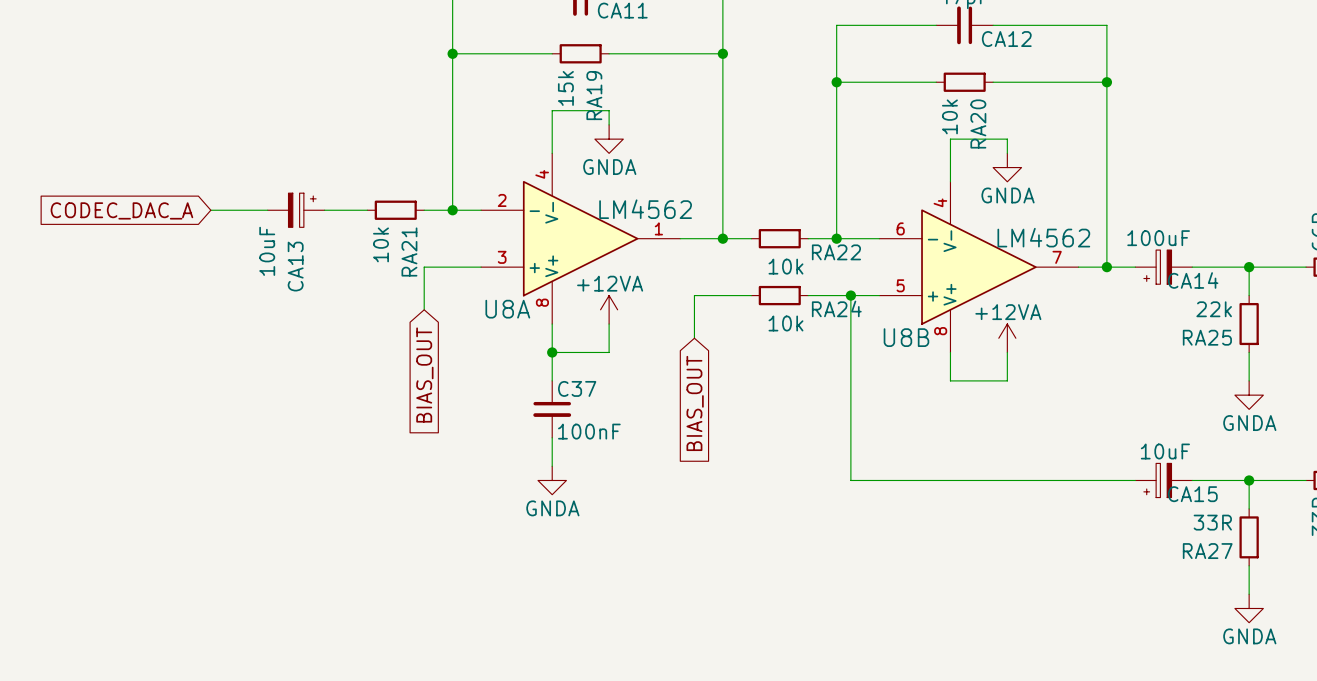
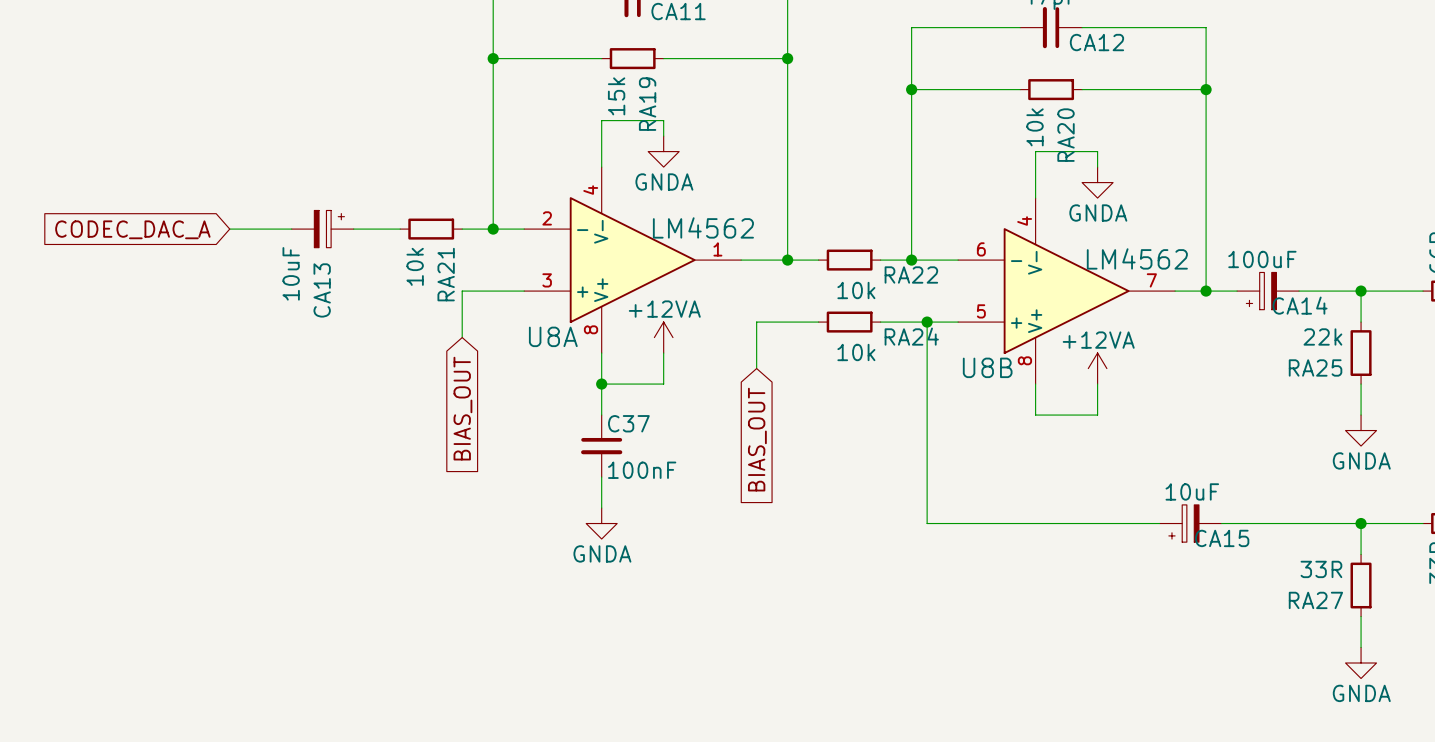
CA15 position: (1163, 480) -> (1190, 523)

